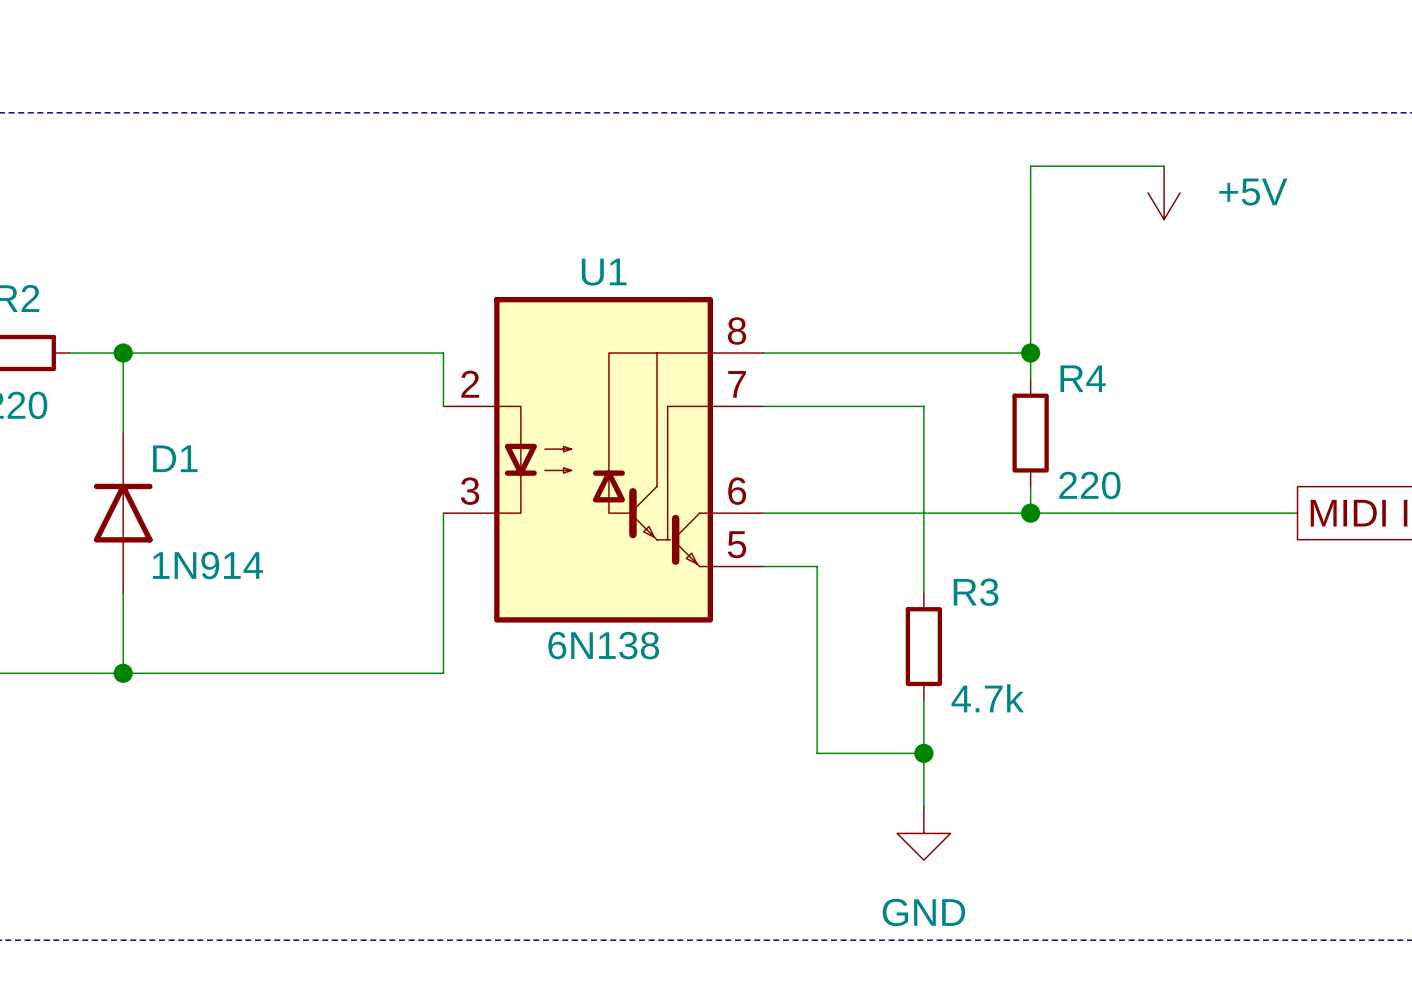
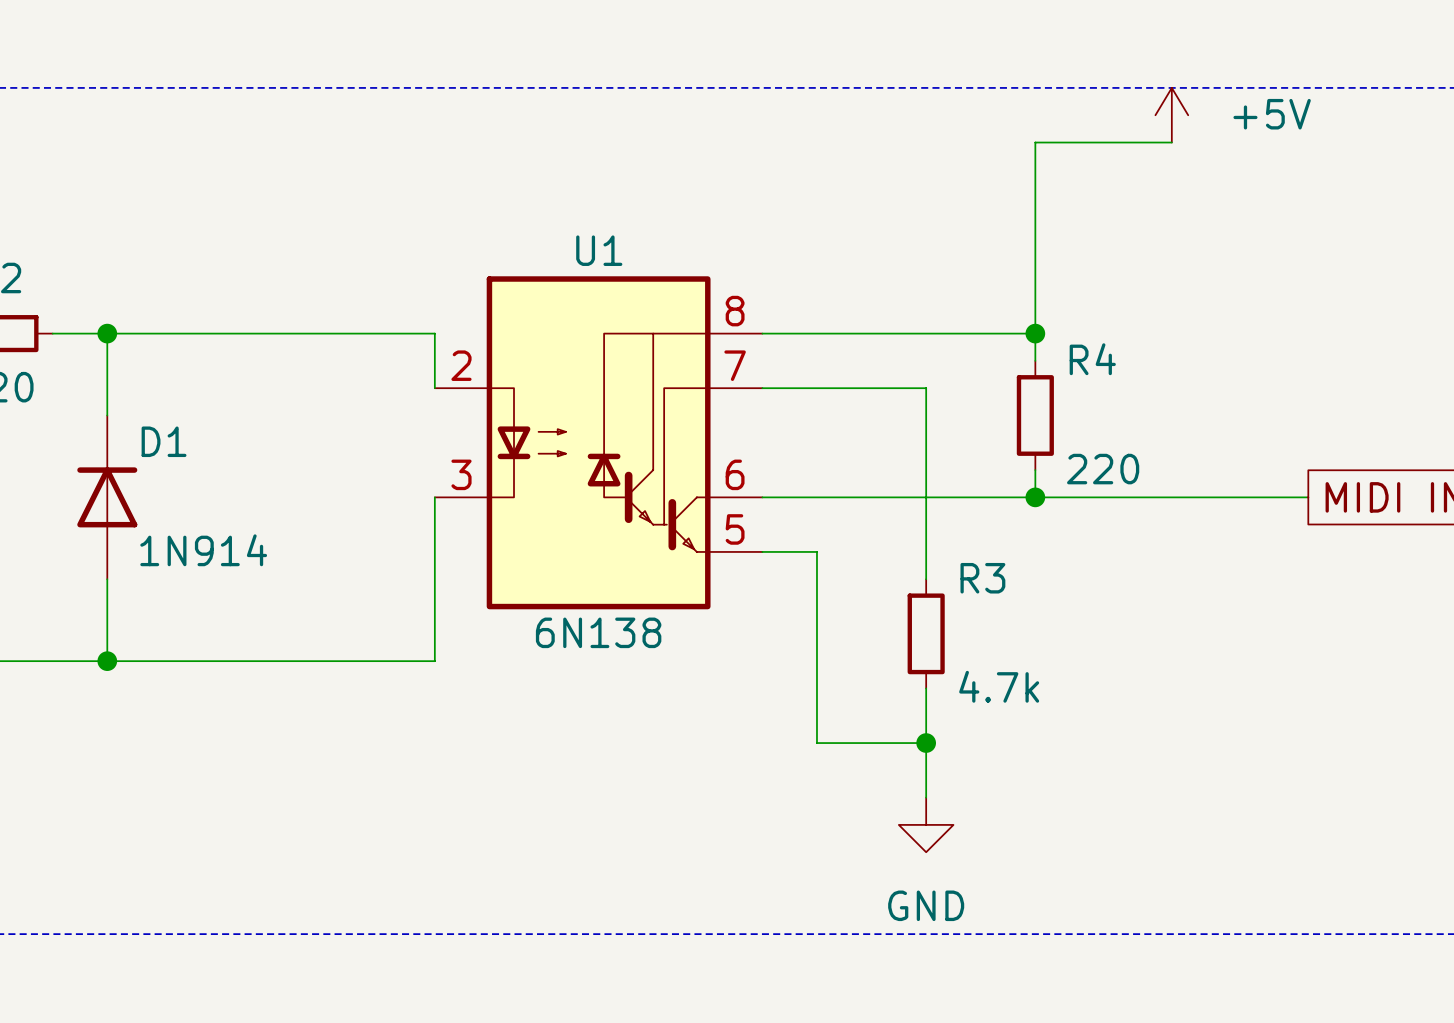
power symbol rotation: 0° (1164, 192) -> 180° (1171, 115)
power symbol position: +5V (1164, 192) -> +5V (1171, 115)

